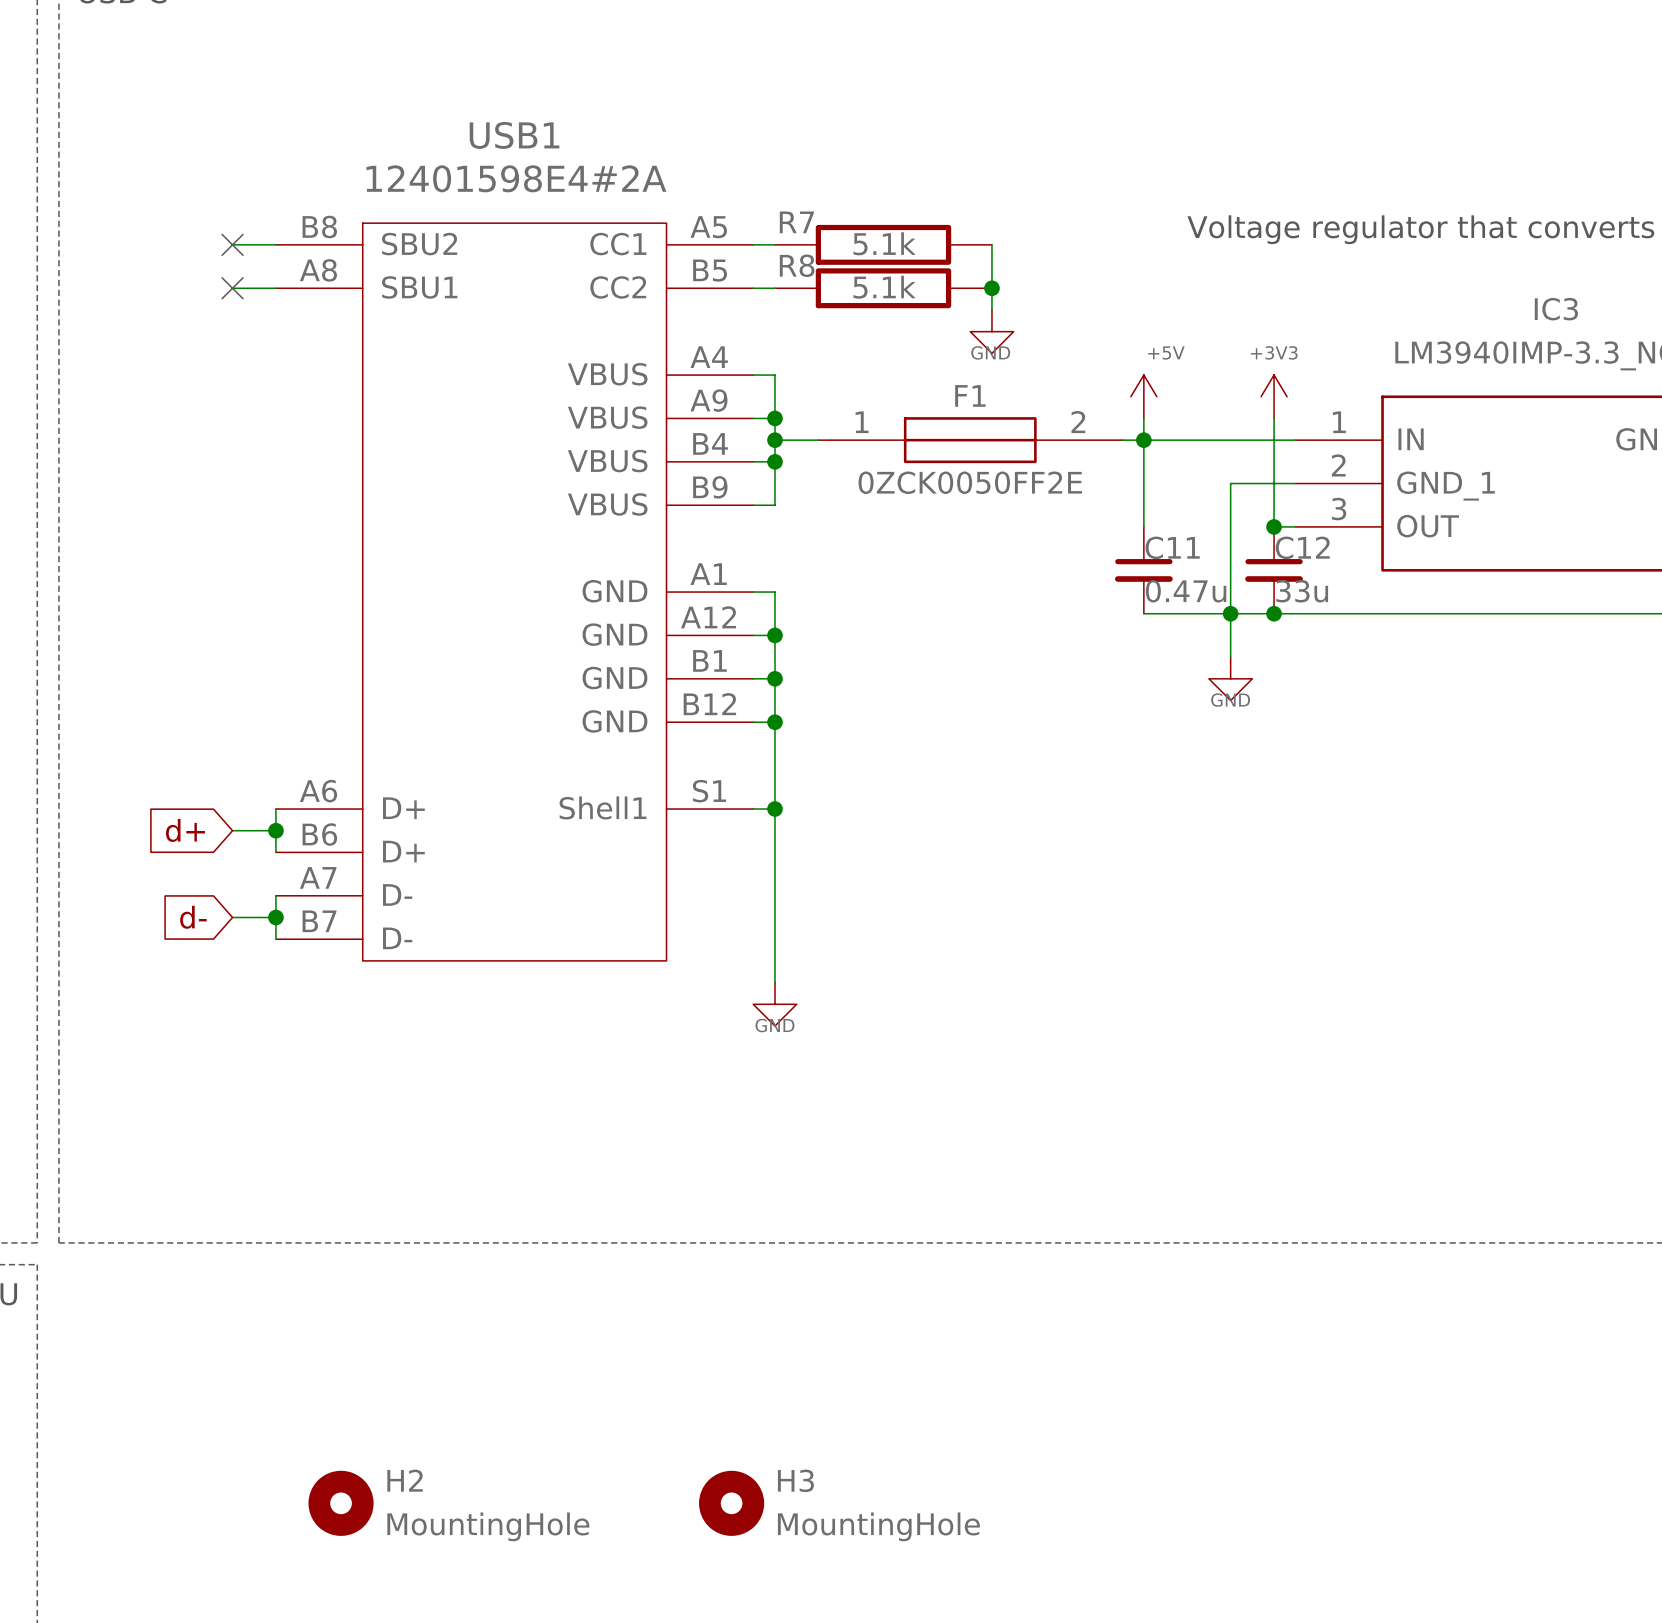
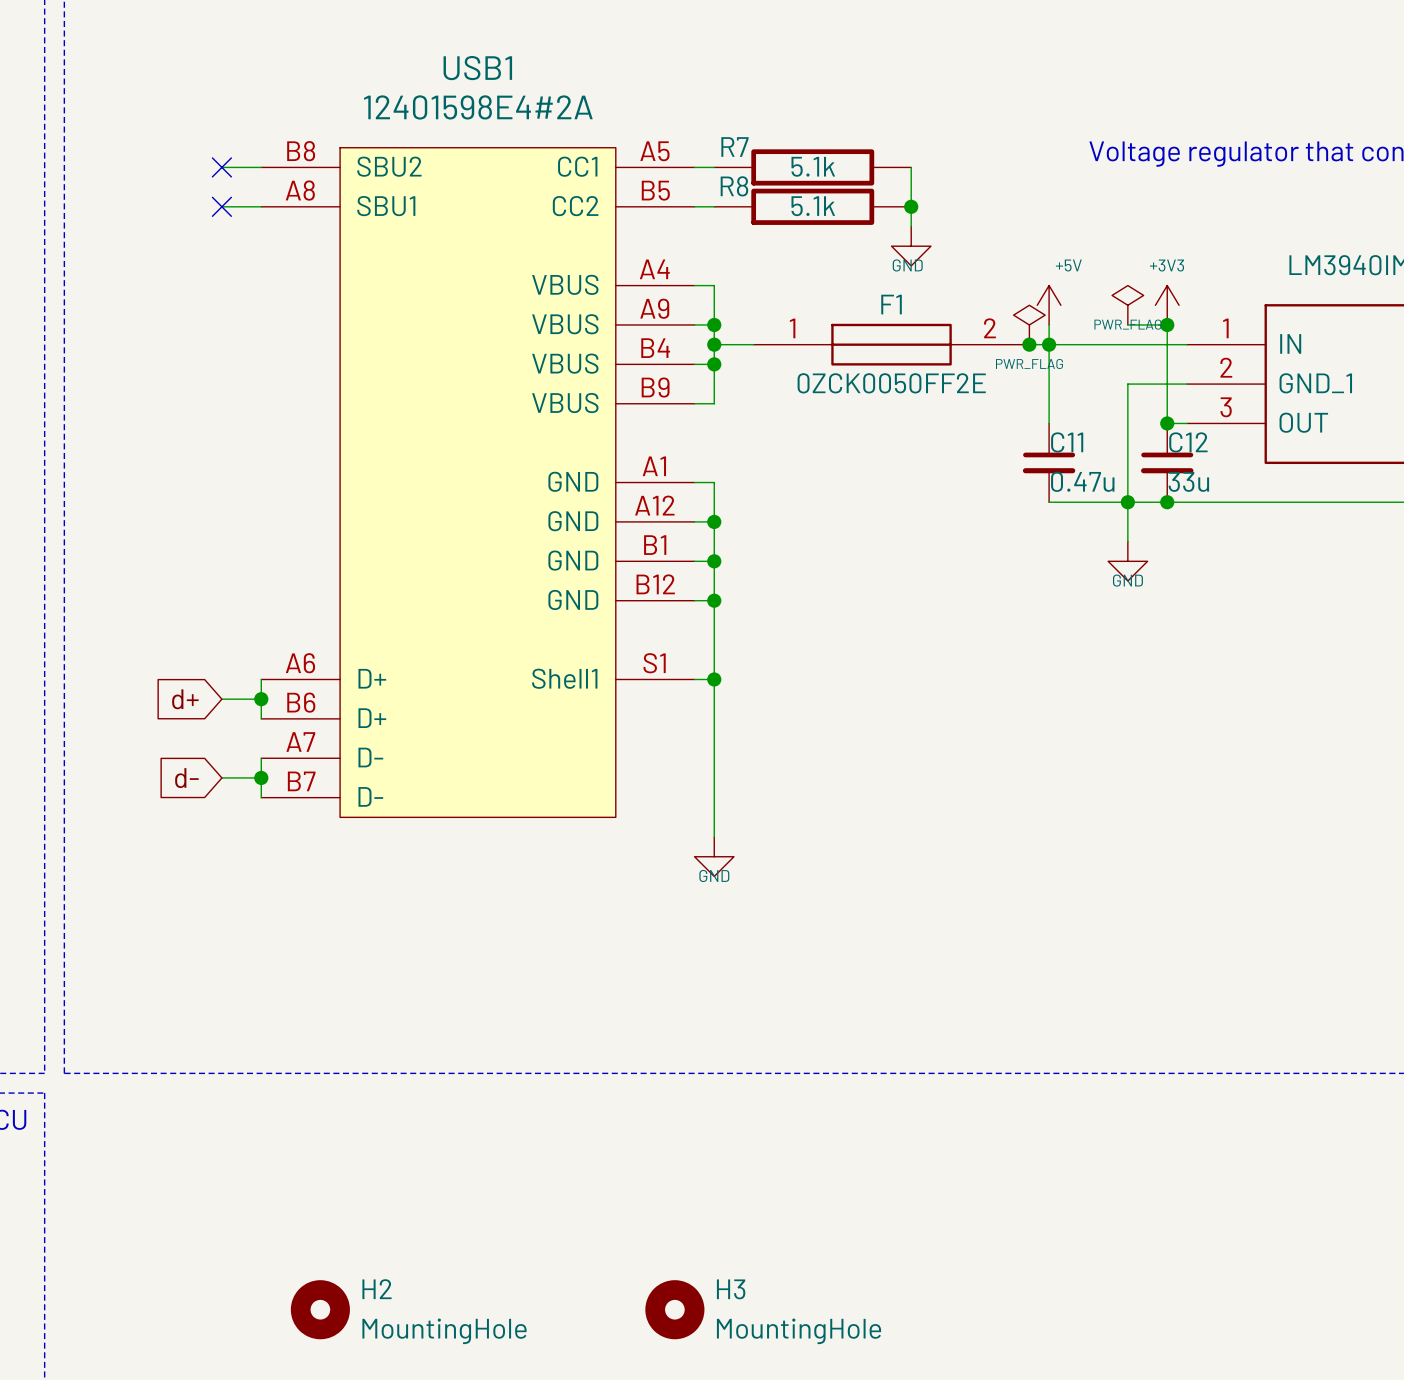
power symbol: none -> PWR_FLAG (1127, 305)
power symbol: none -> PWR_FLAG (1029, 324)
wire: none -> (1127, 324) (1167, 324)
junction: none -> (1167, 324)
junction: none -> (1029, 344)

